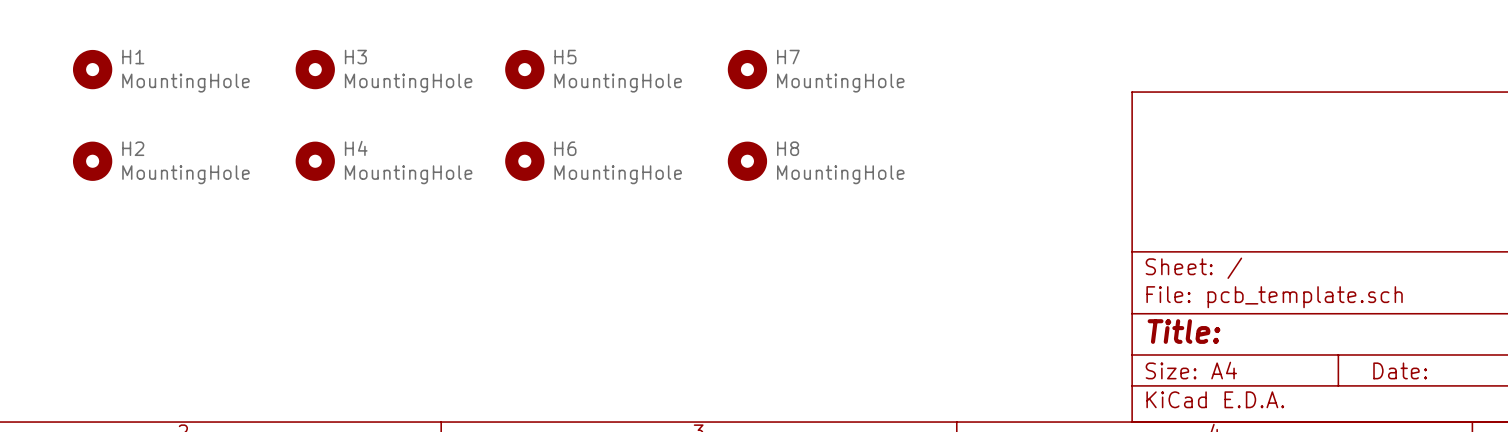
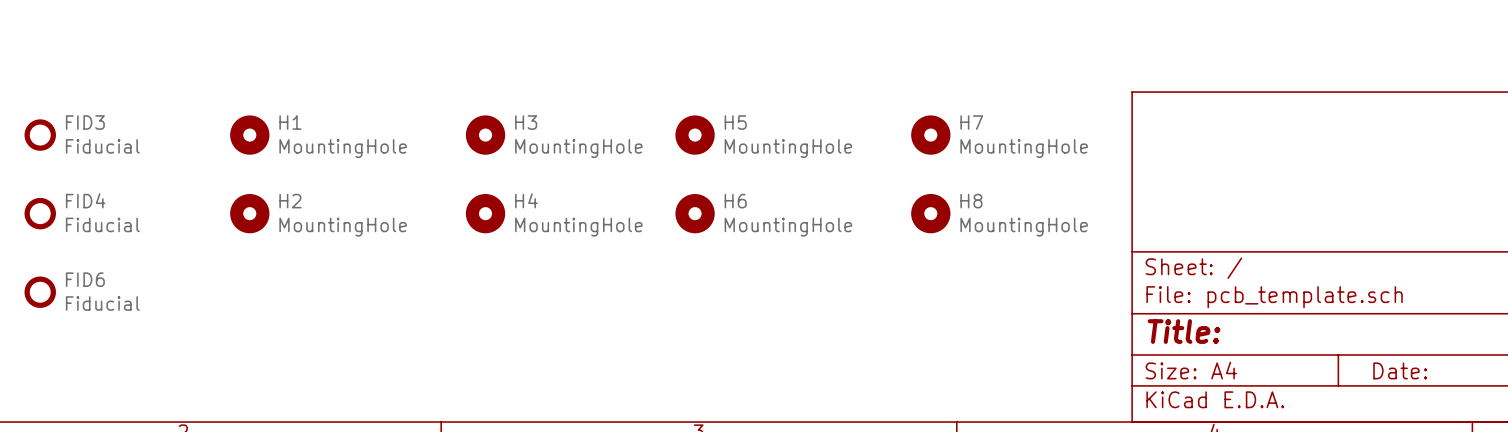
H1 position: (92, 69) -> (249, 135)
H3 position: (315, 69) -> (485, 135)
H5 position: (524, 69) -> (695, 135)
H7 position: (747, 69) -> (930, 135)
FID3: none -> Fiducial (40, 135)
H2 position: (92, 161) -> (249, 213)
H4 position: (315, 161) -> (485, 213)
H6 position: (524, 161) -> (695, 213)
H8 position: (747, 161) -> (930, 213)
FID4: none -> Fiducial (40, 213)
FID6: none -> Fiducial (40, 292)

